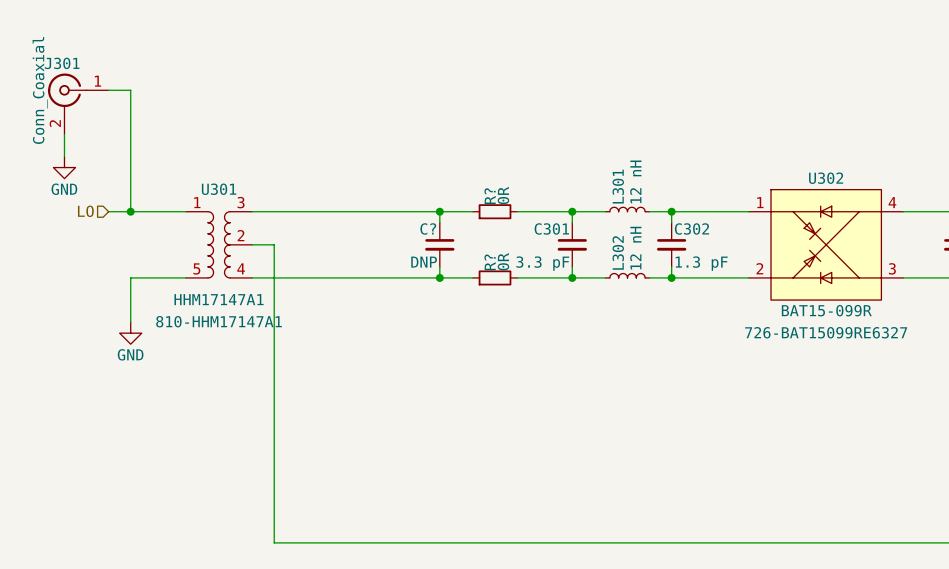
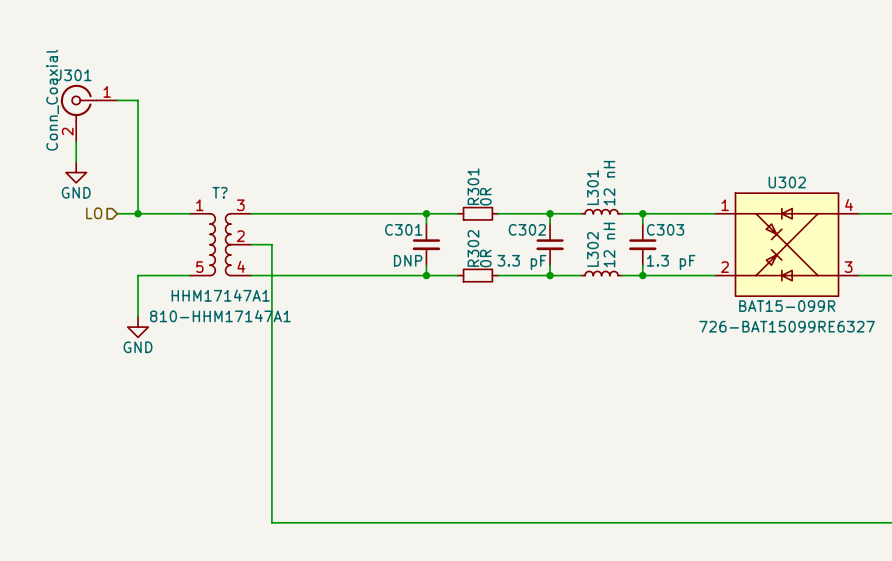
U301 name: U301 (219, 189) -> T? (219, 192)
R? name: R? (490, 196) -> R301 (473, 186)
C? name: C? (428, 228) -> C301 (403, 229)
C301 name: C301 (551, 228) -> C302 (527, 229)
C302 name: C302 (691, 228) -> C303 (665, 229)
R? name: R? (490, 262) -> R302 (473, 248)

